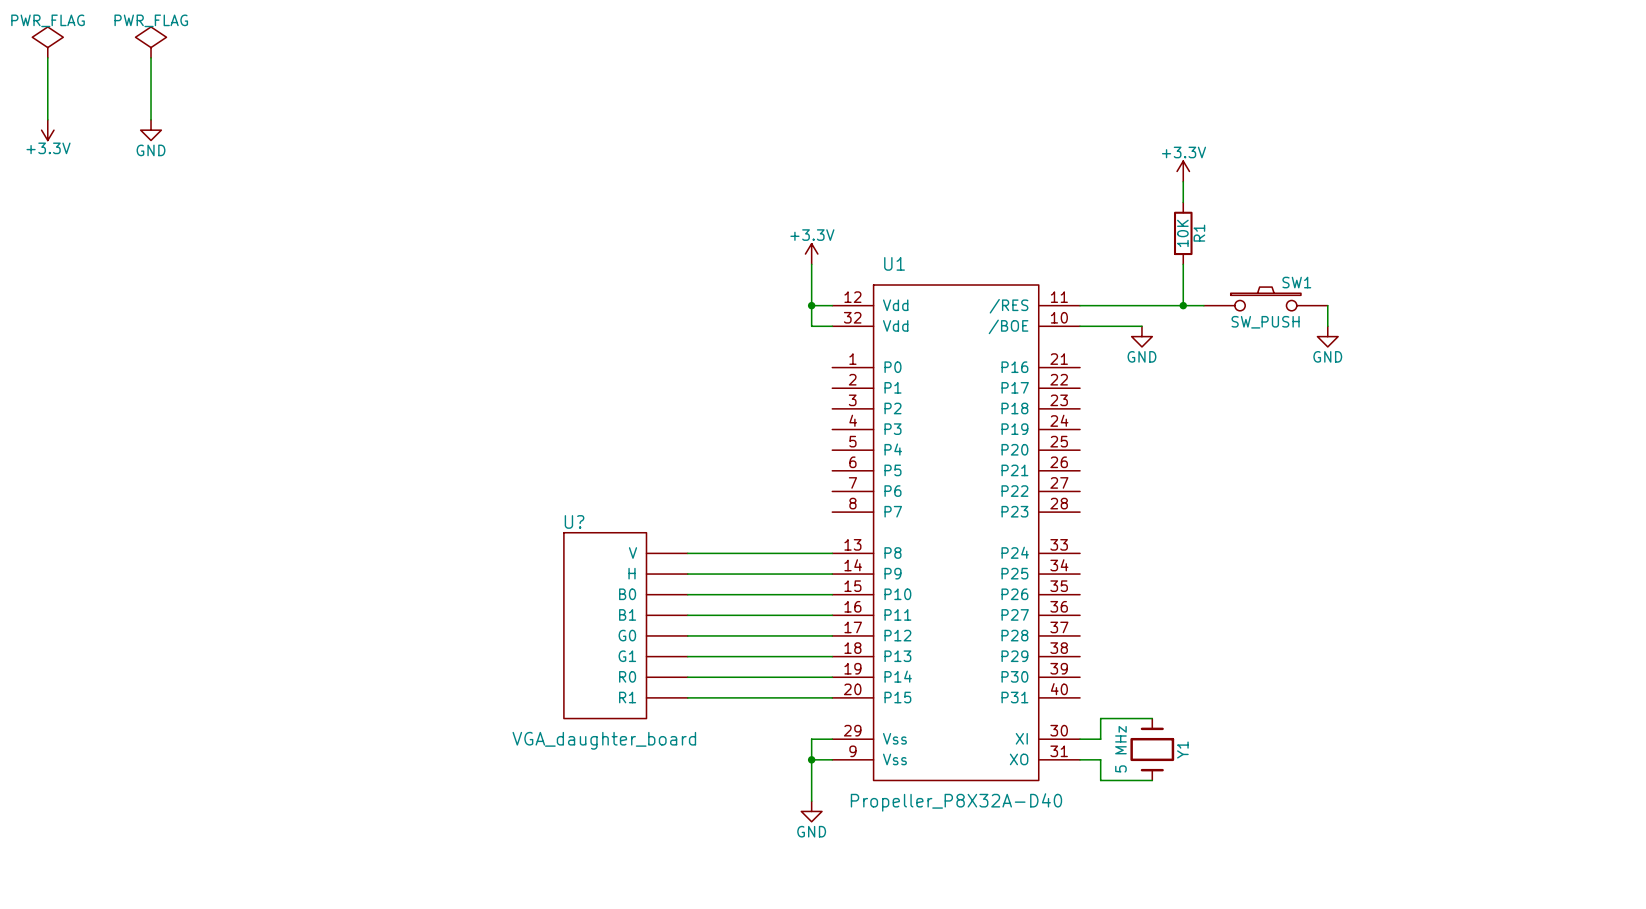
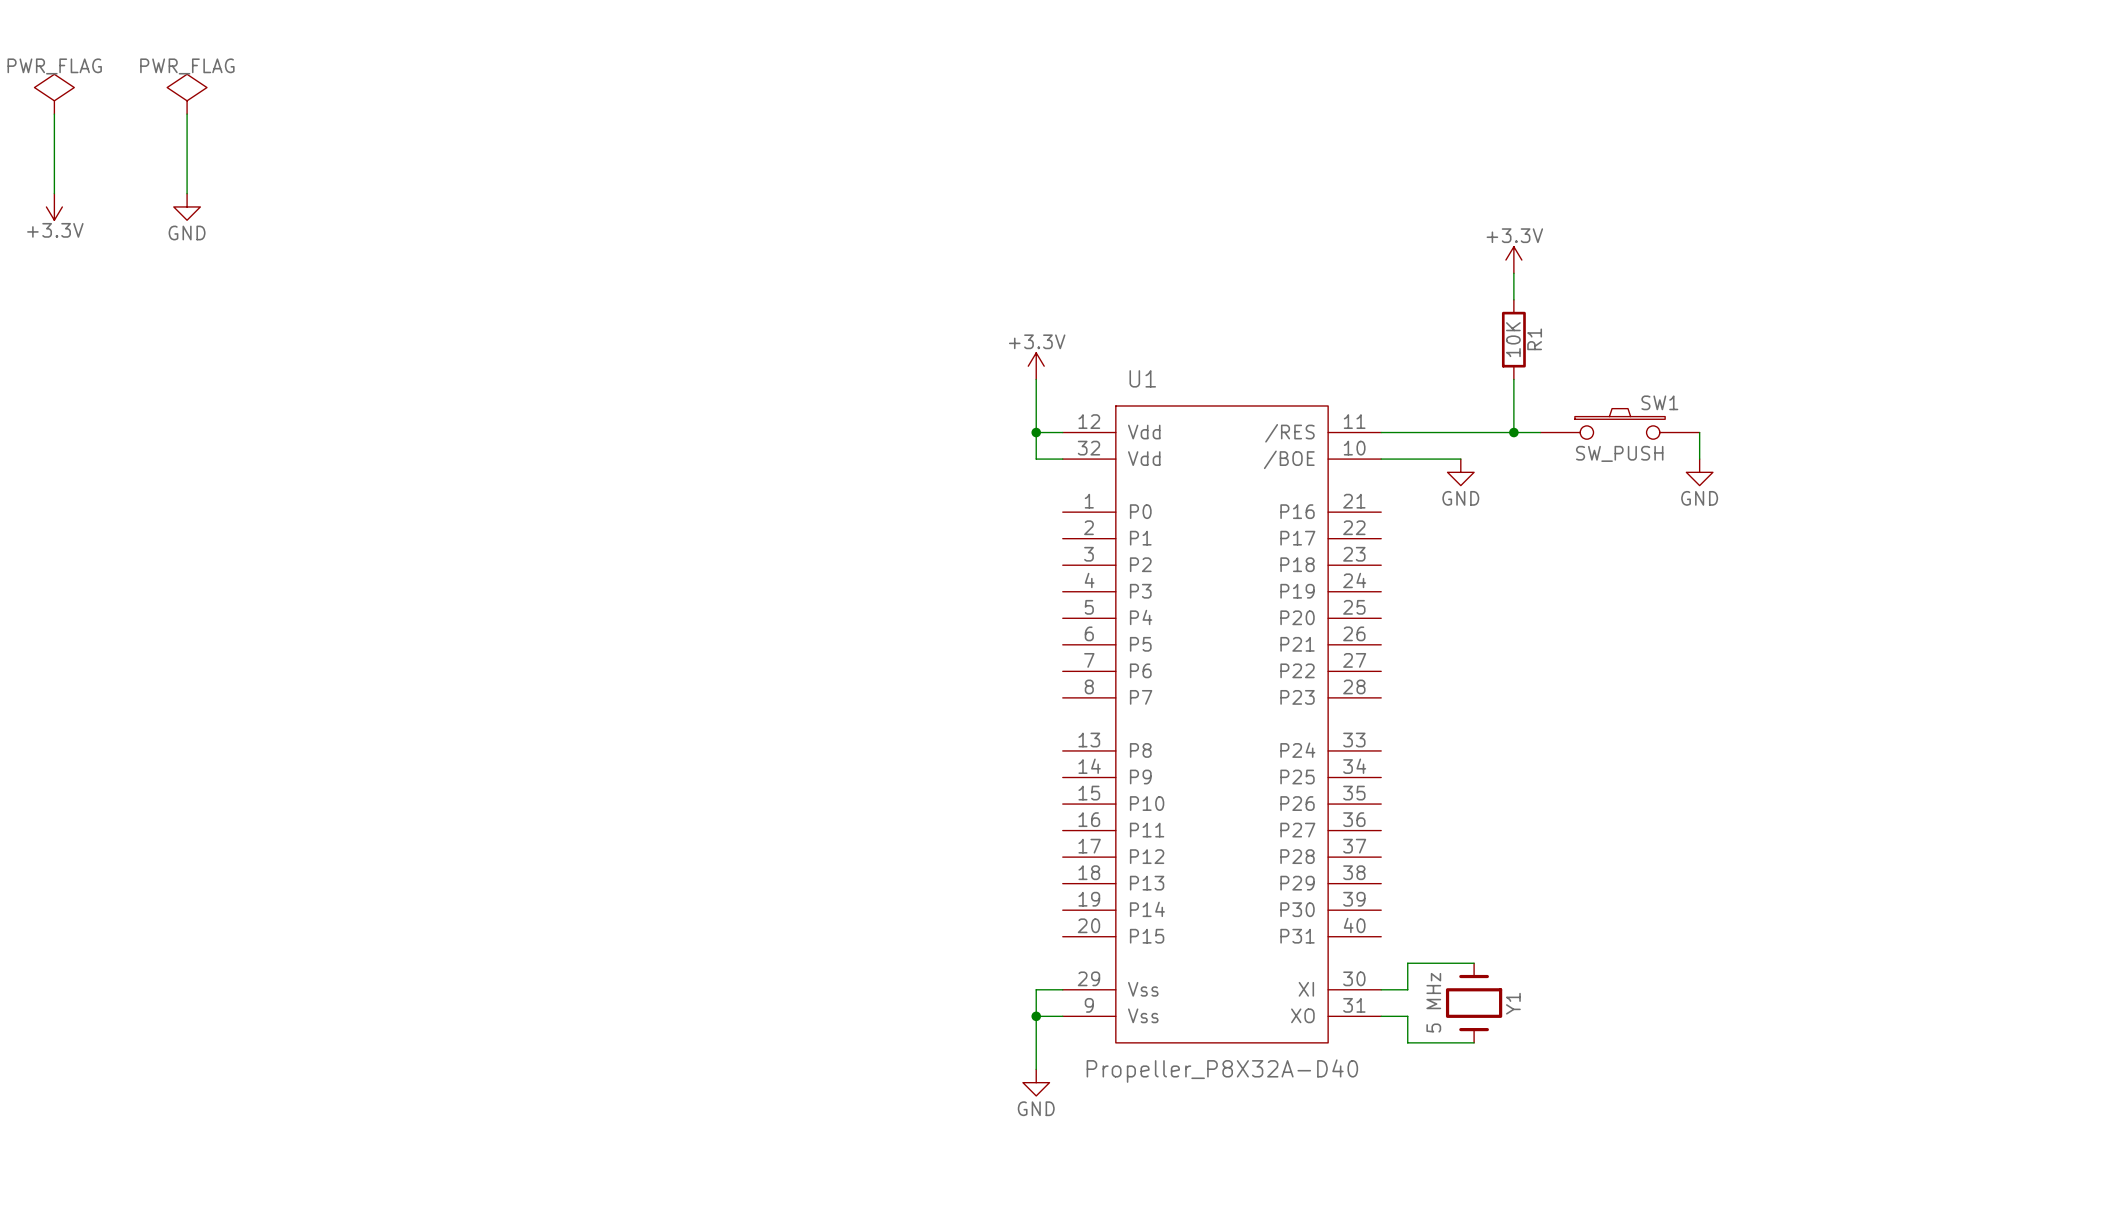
wire: (687, 553) (832, 553) -> none
wire: (687, 574) (832, 574) -> none
wire: (687, 594) (832, 594) -> none
wire: (687, 615) (832, 615) -> none
U?: VGA_daughter_board (625, 625) -> none
wire: (687, 635) (832, 635) -> none
wire: (687, 656) (832, 656) -> none
wire: (687, 677) (832, 677) -> none
wire: (687, 697) (832, 697) -> none

